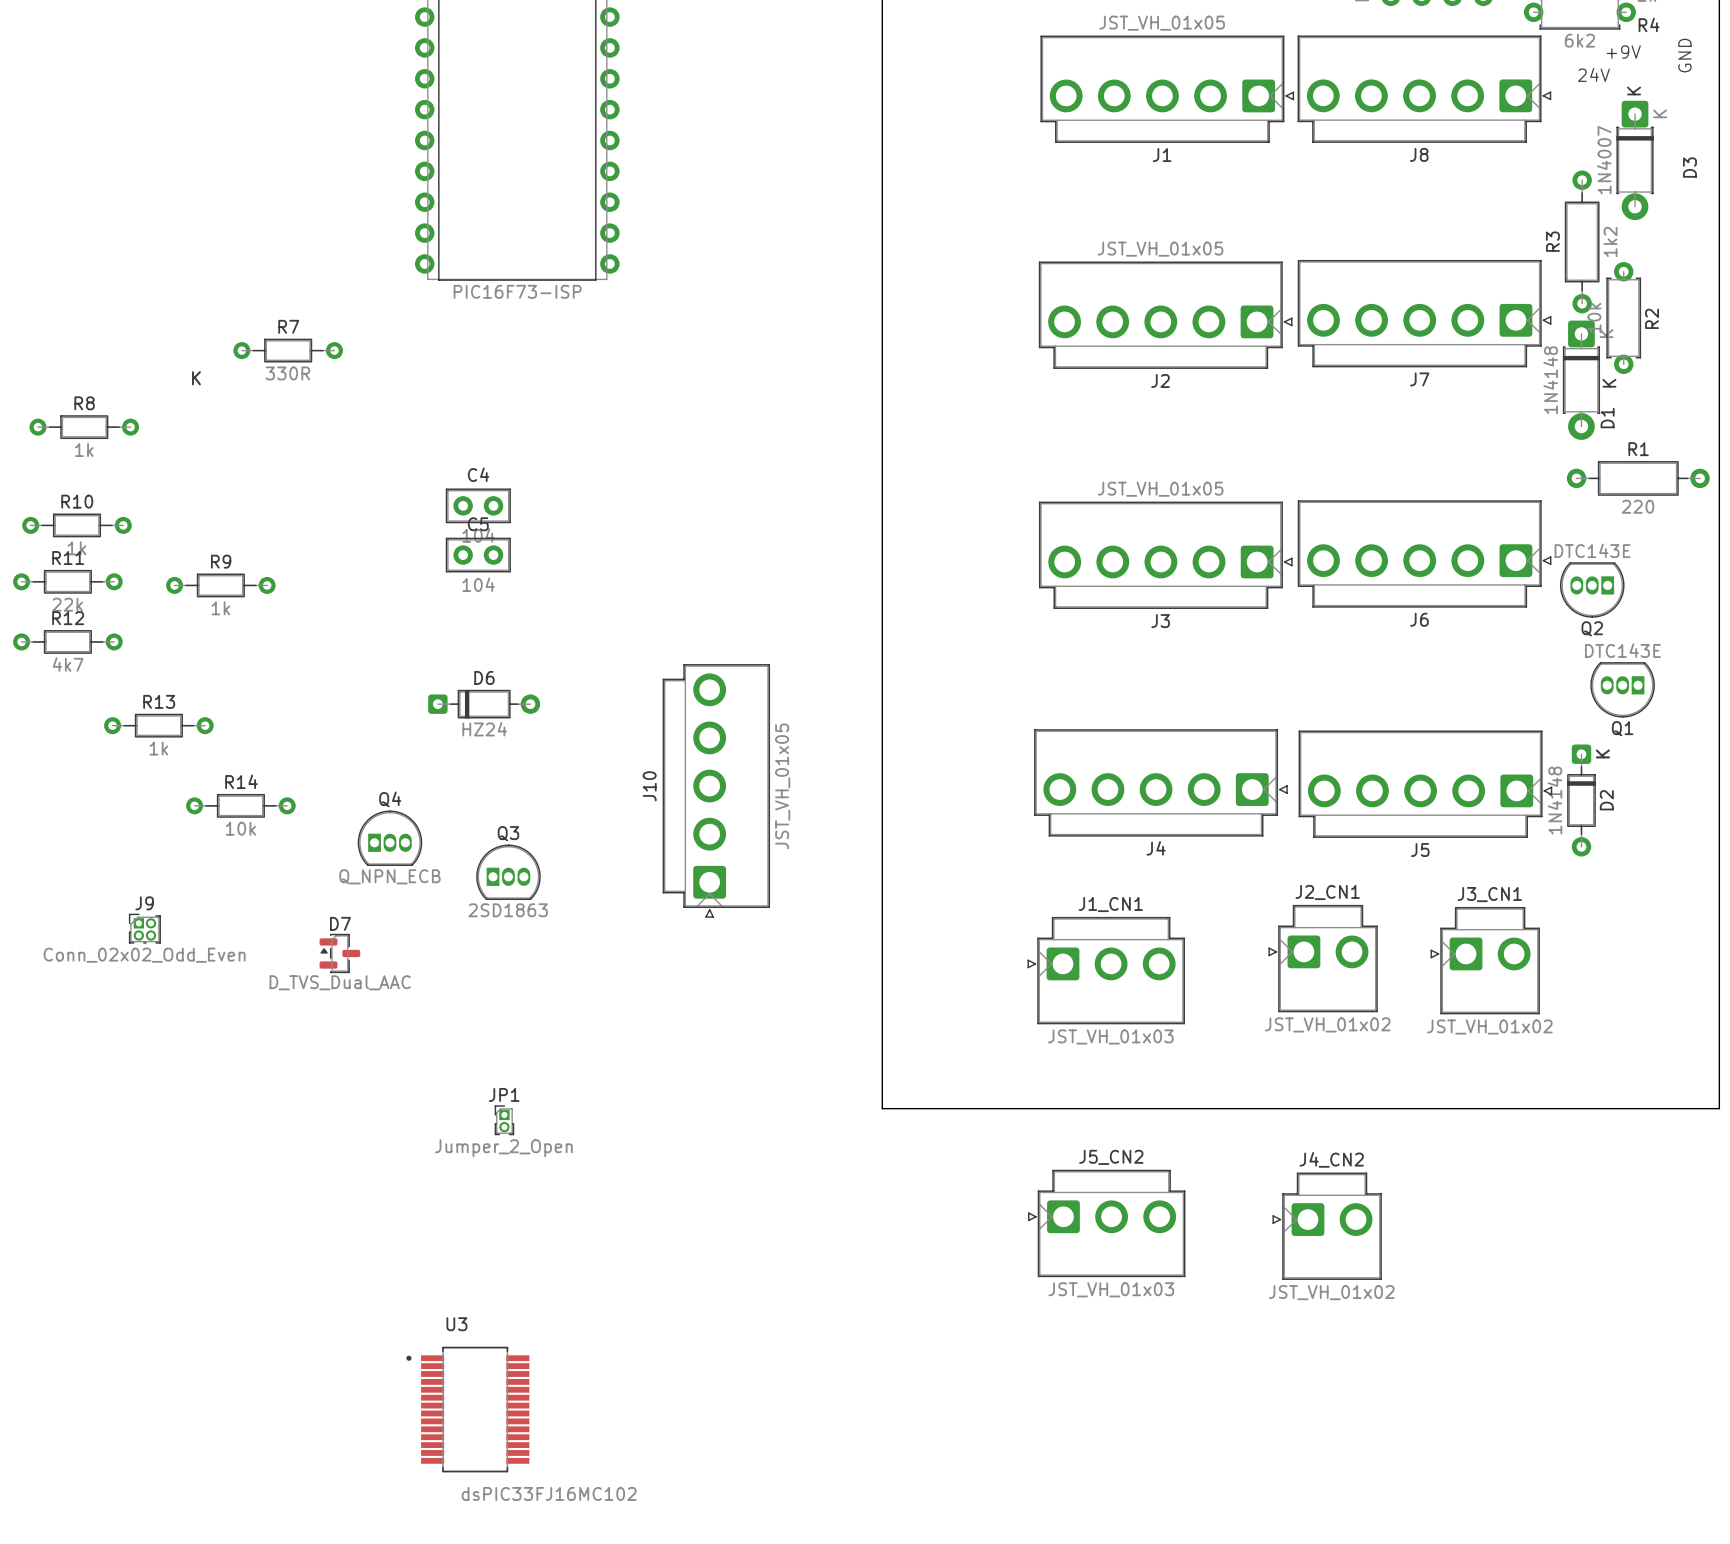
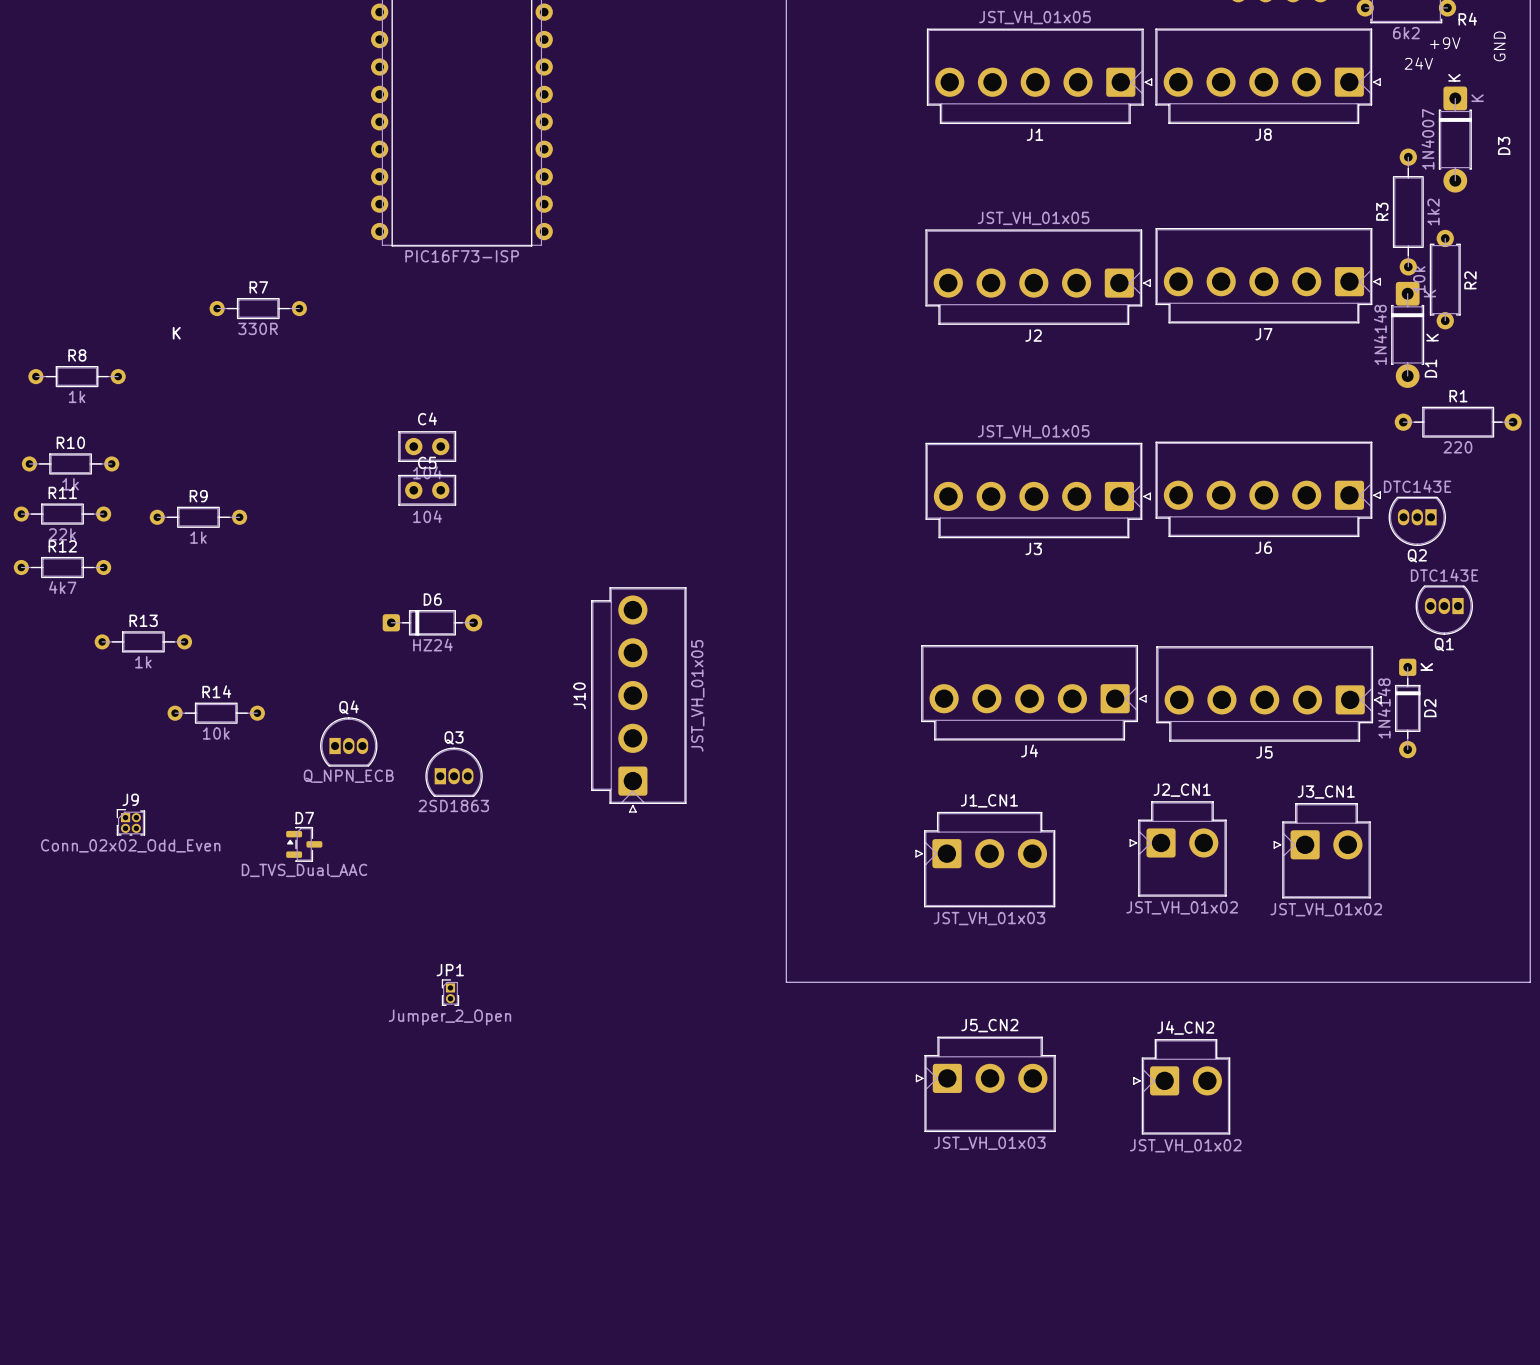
U3: dsPIC33FJ16MC102 (467, 1409) -> none

